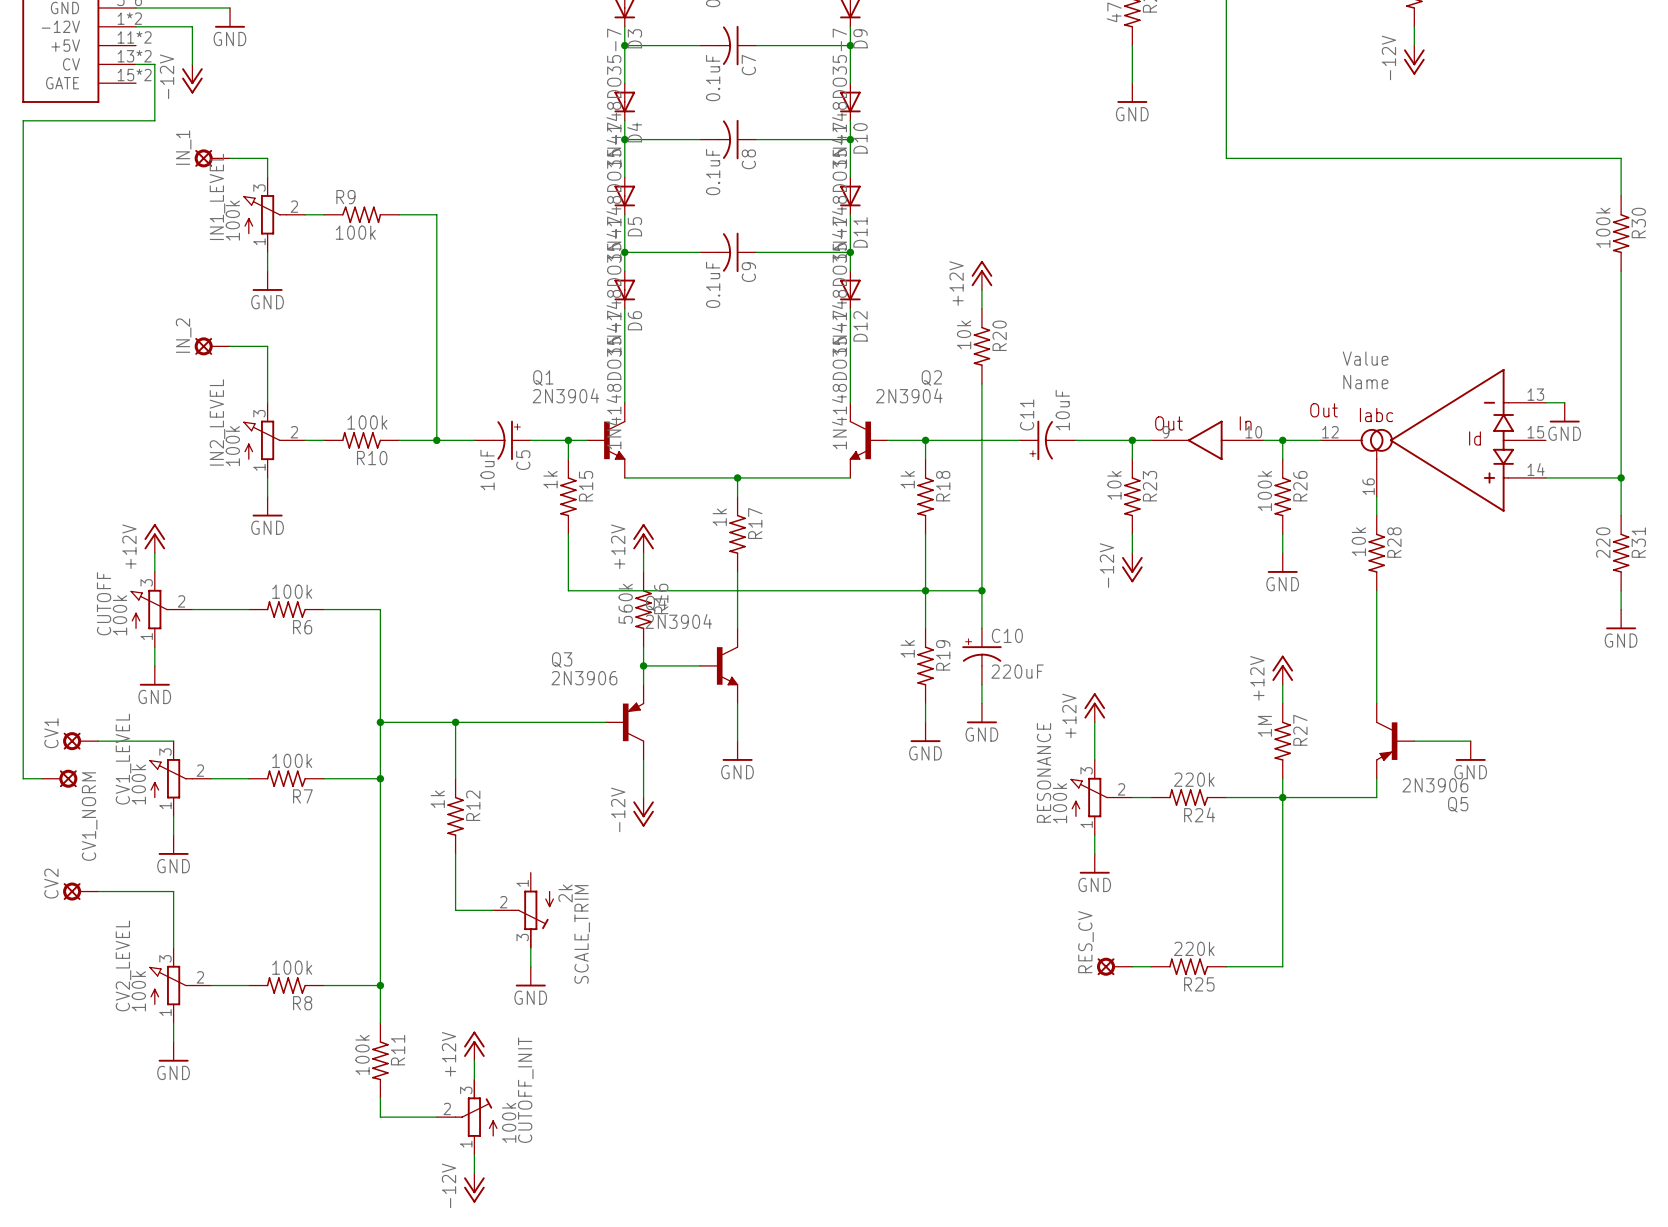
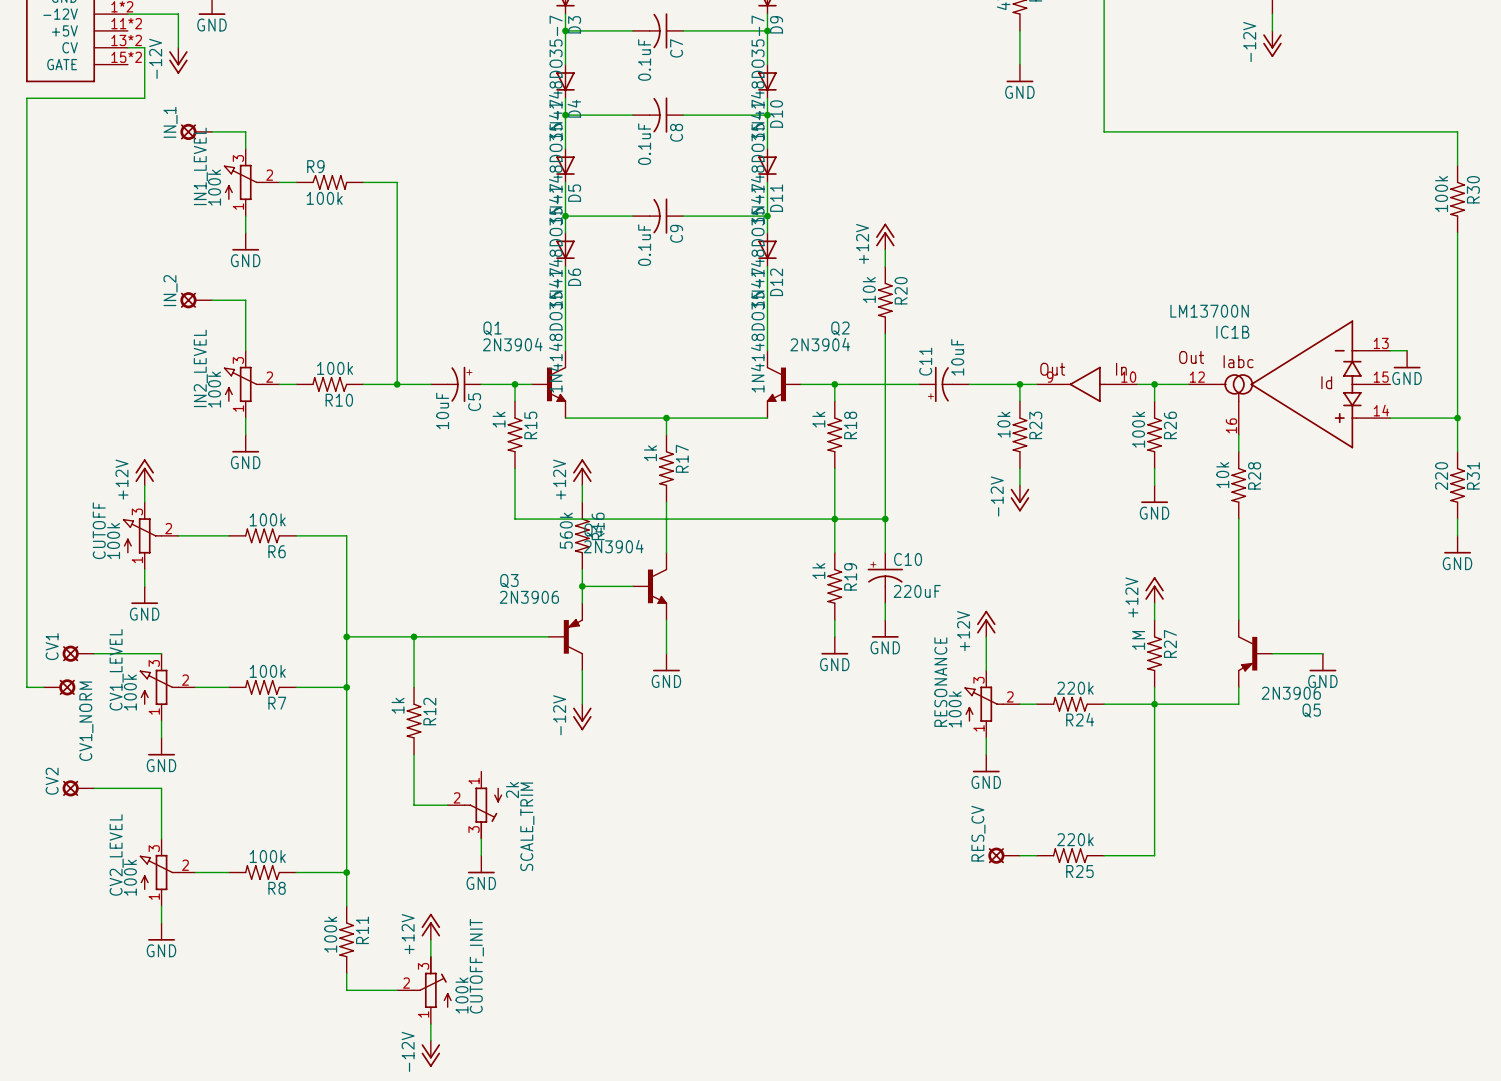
IC1B value: none -> LM13700N (1209, 311)
IC1B text: Value (1365, 358) -> none
IC1B text: Name (1365, 382) -> none
IC1B name: none -> IC1B (1232, 332)

